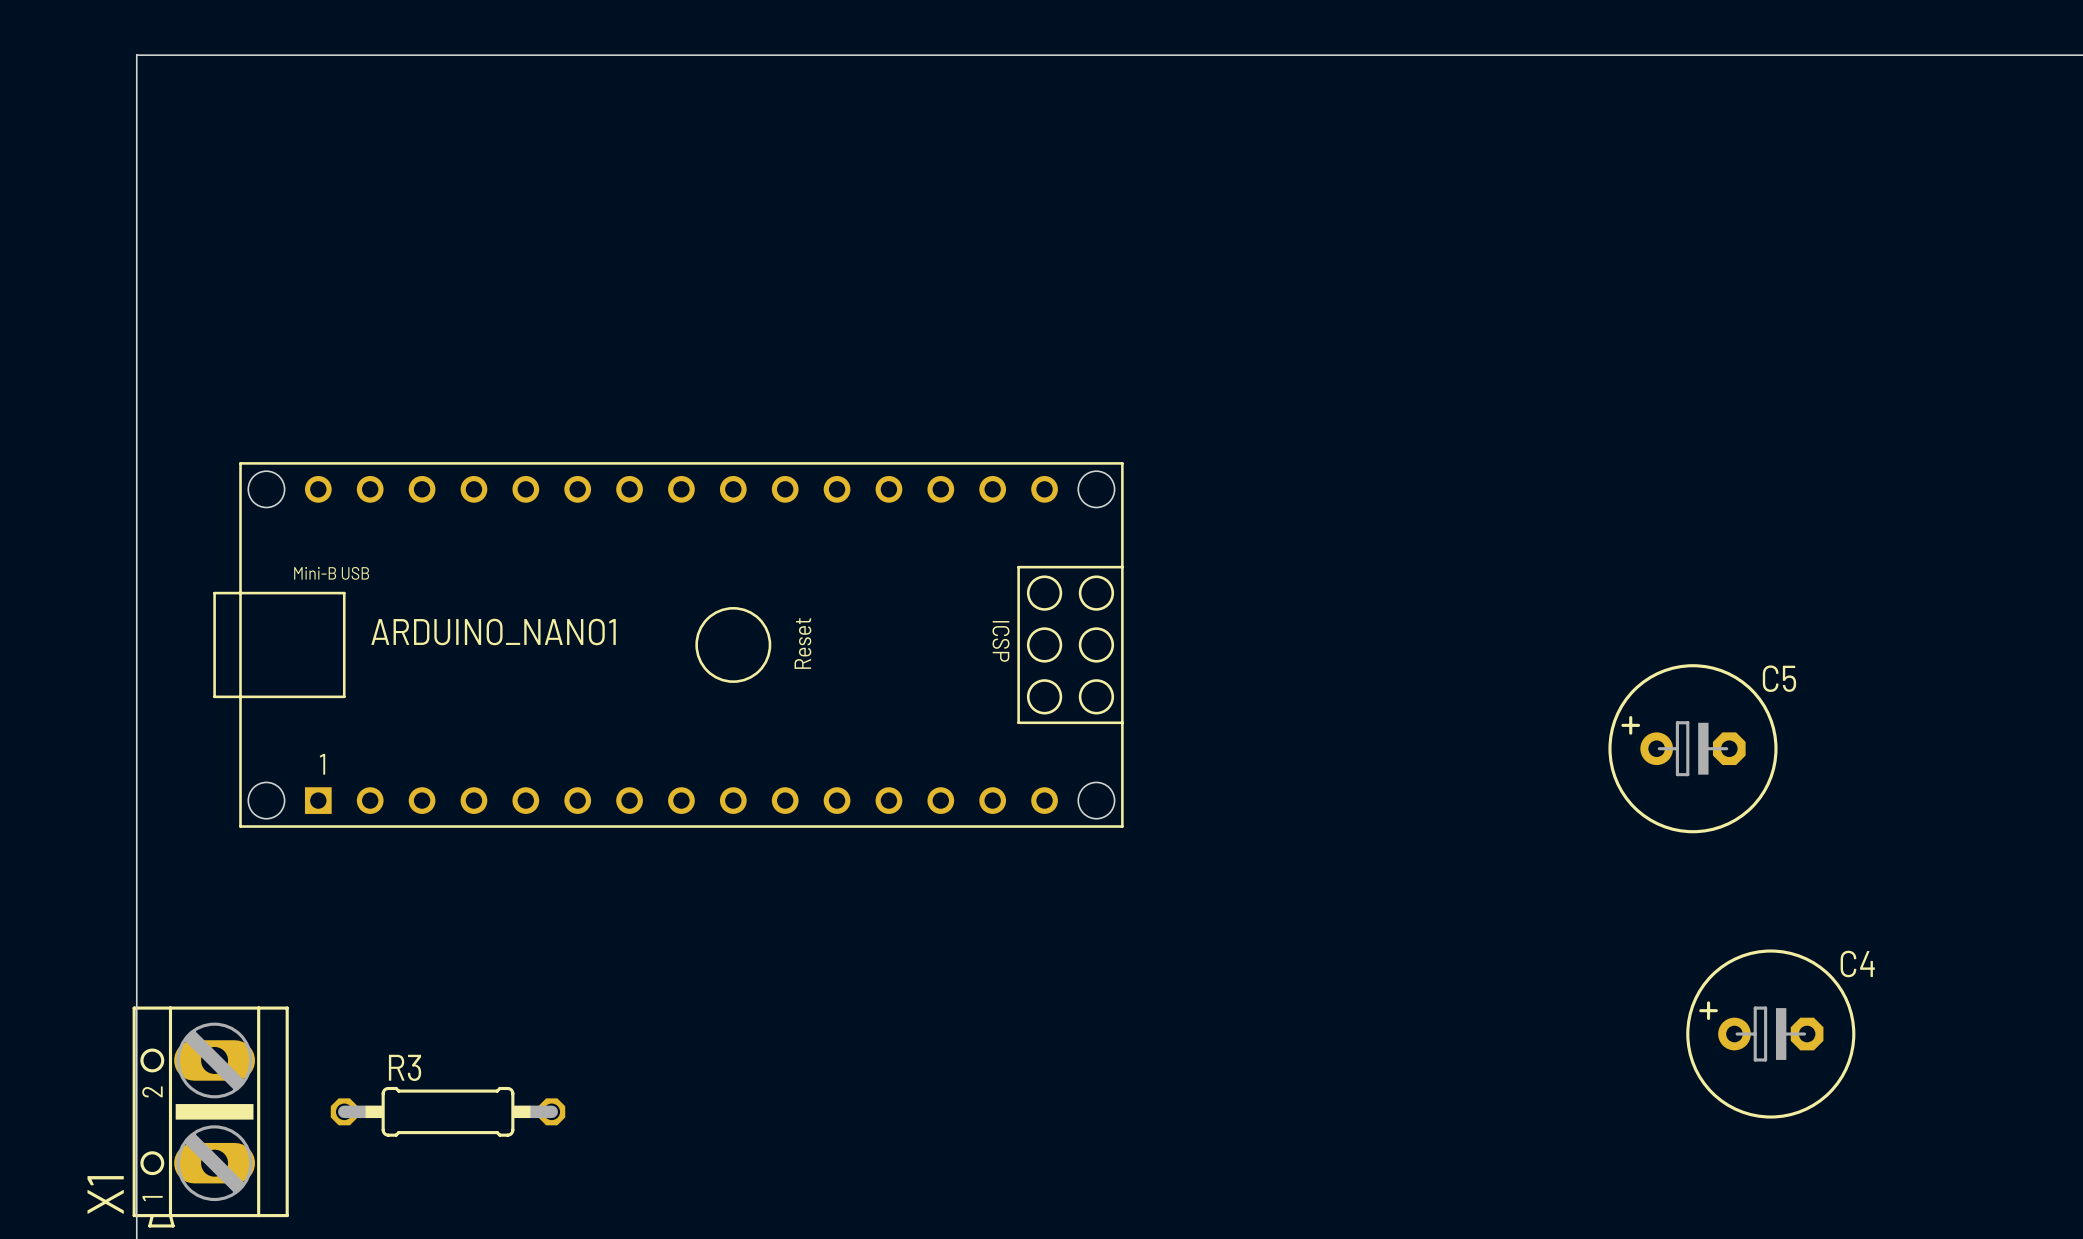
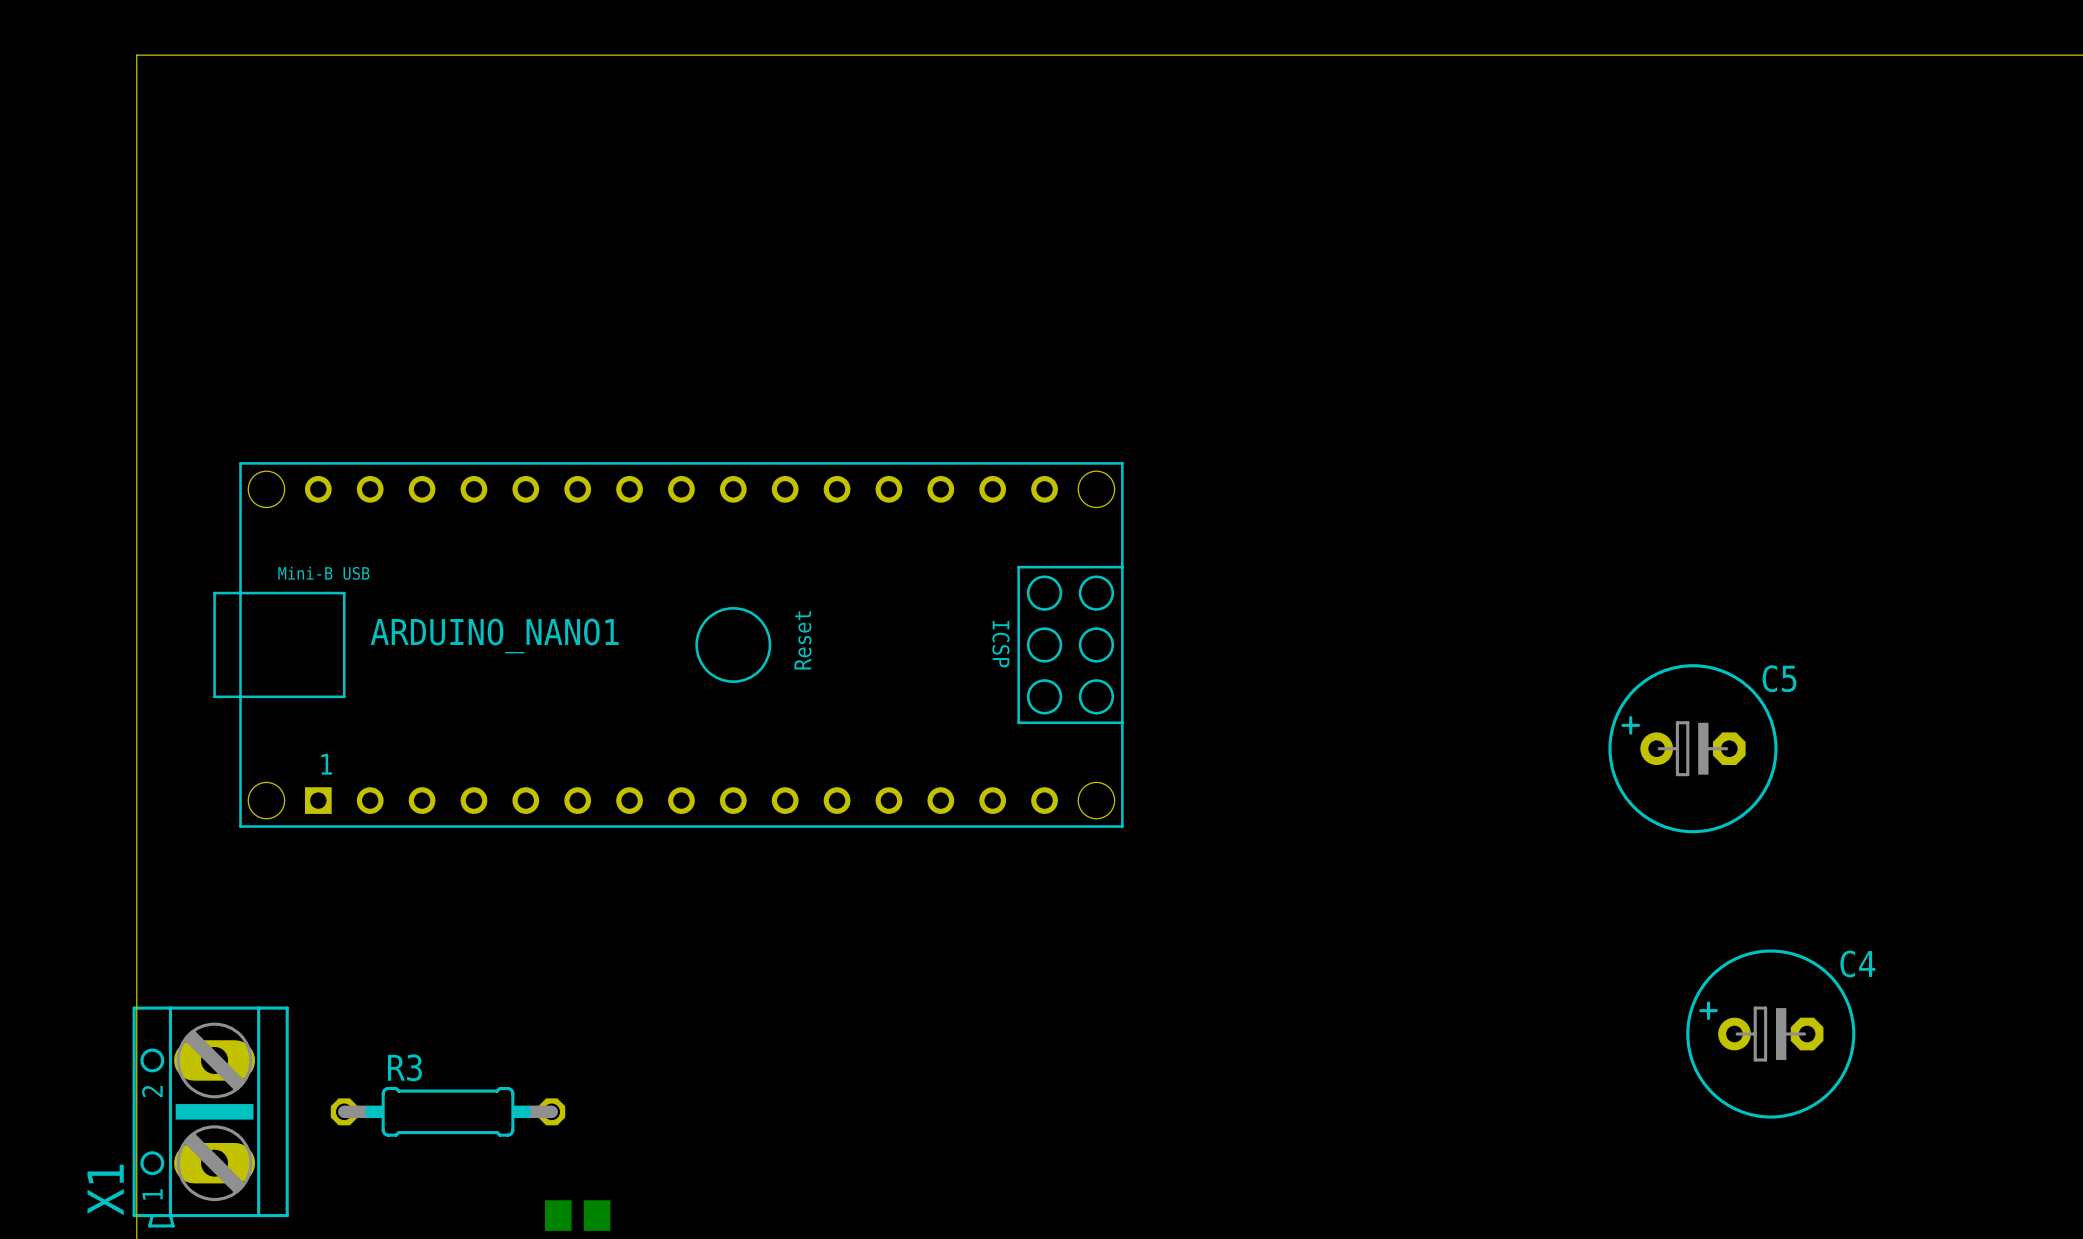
part: none -> (577, 1215)

